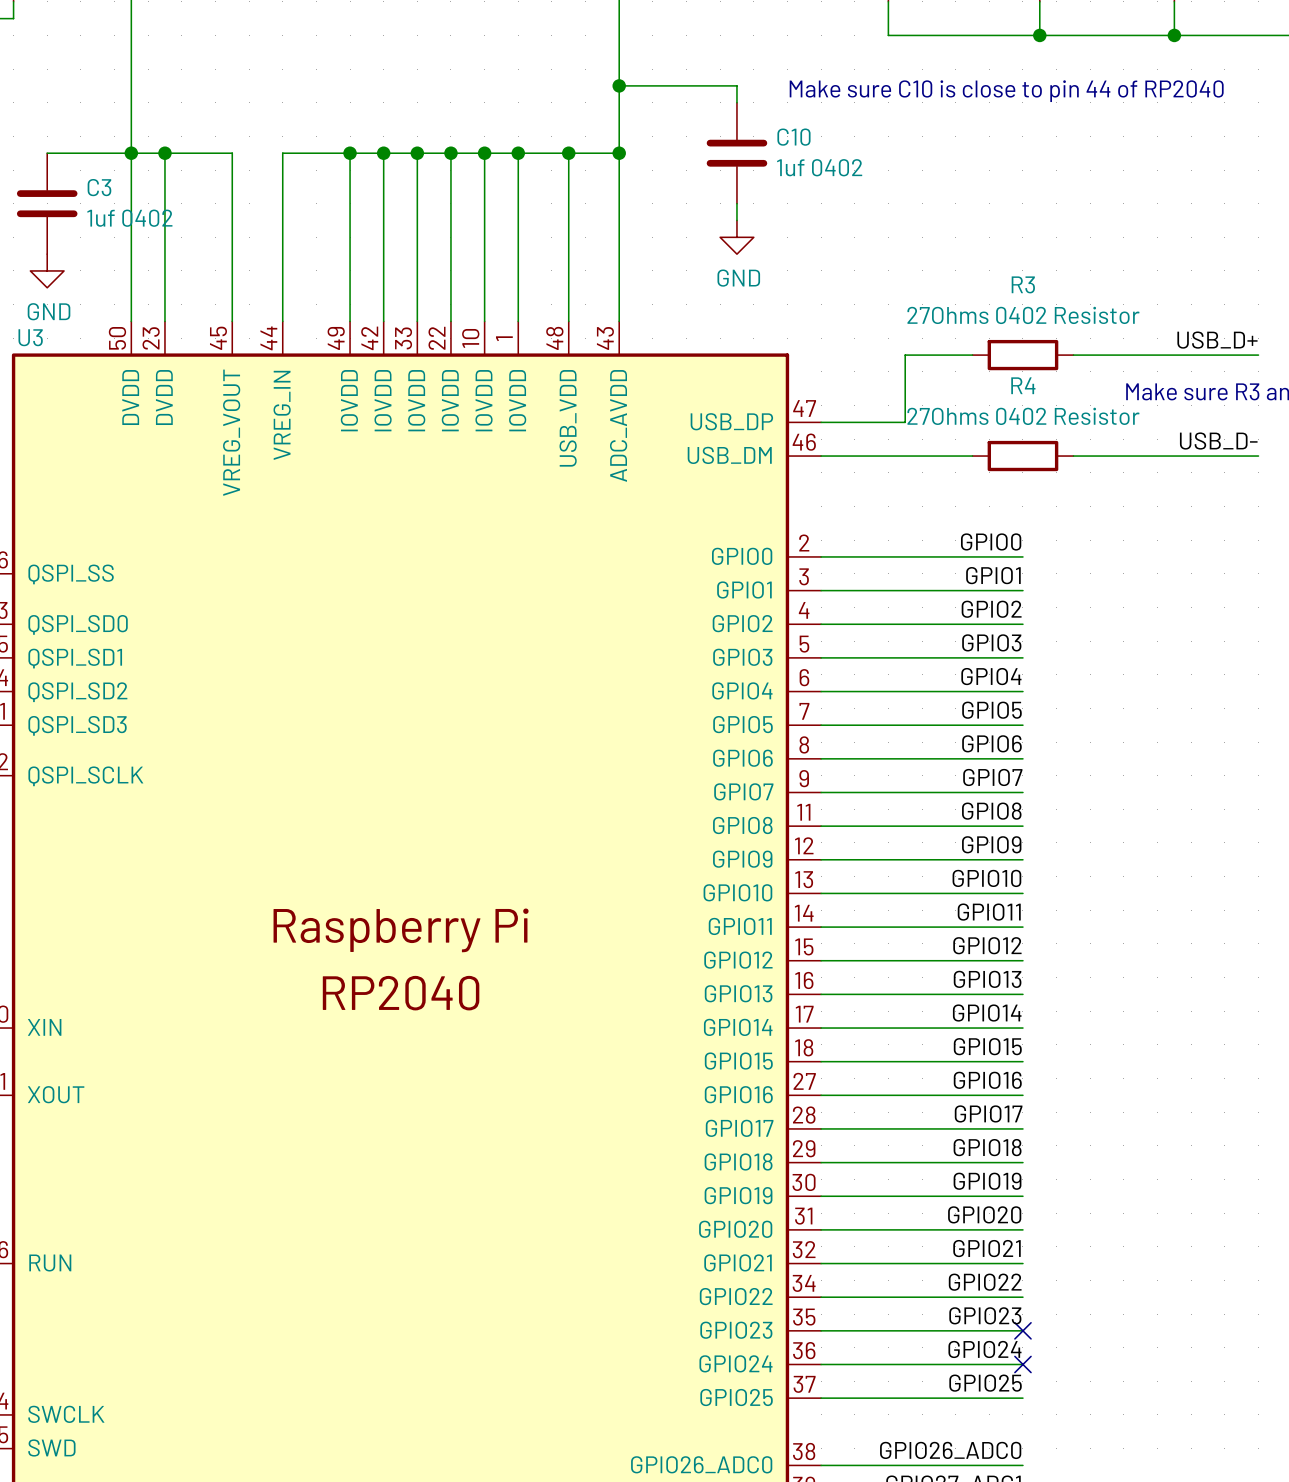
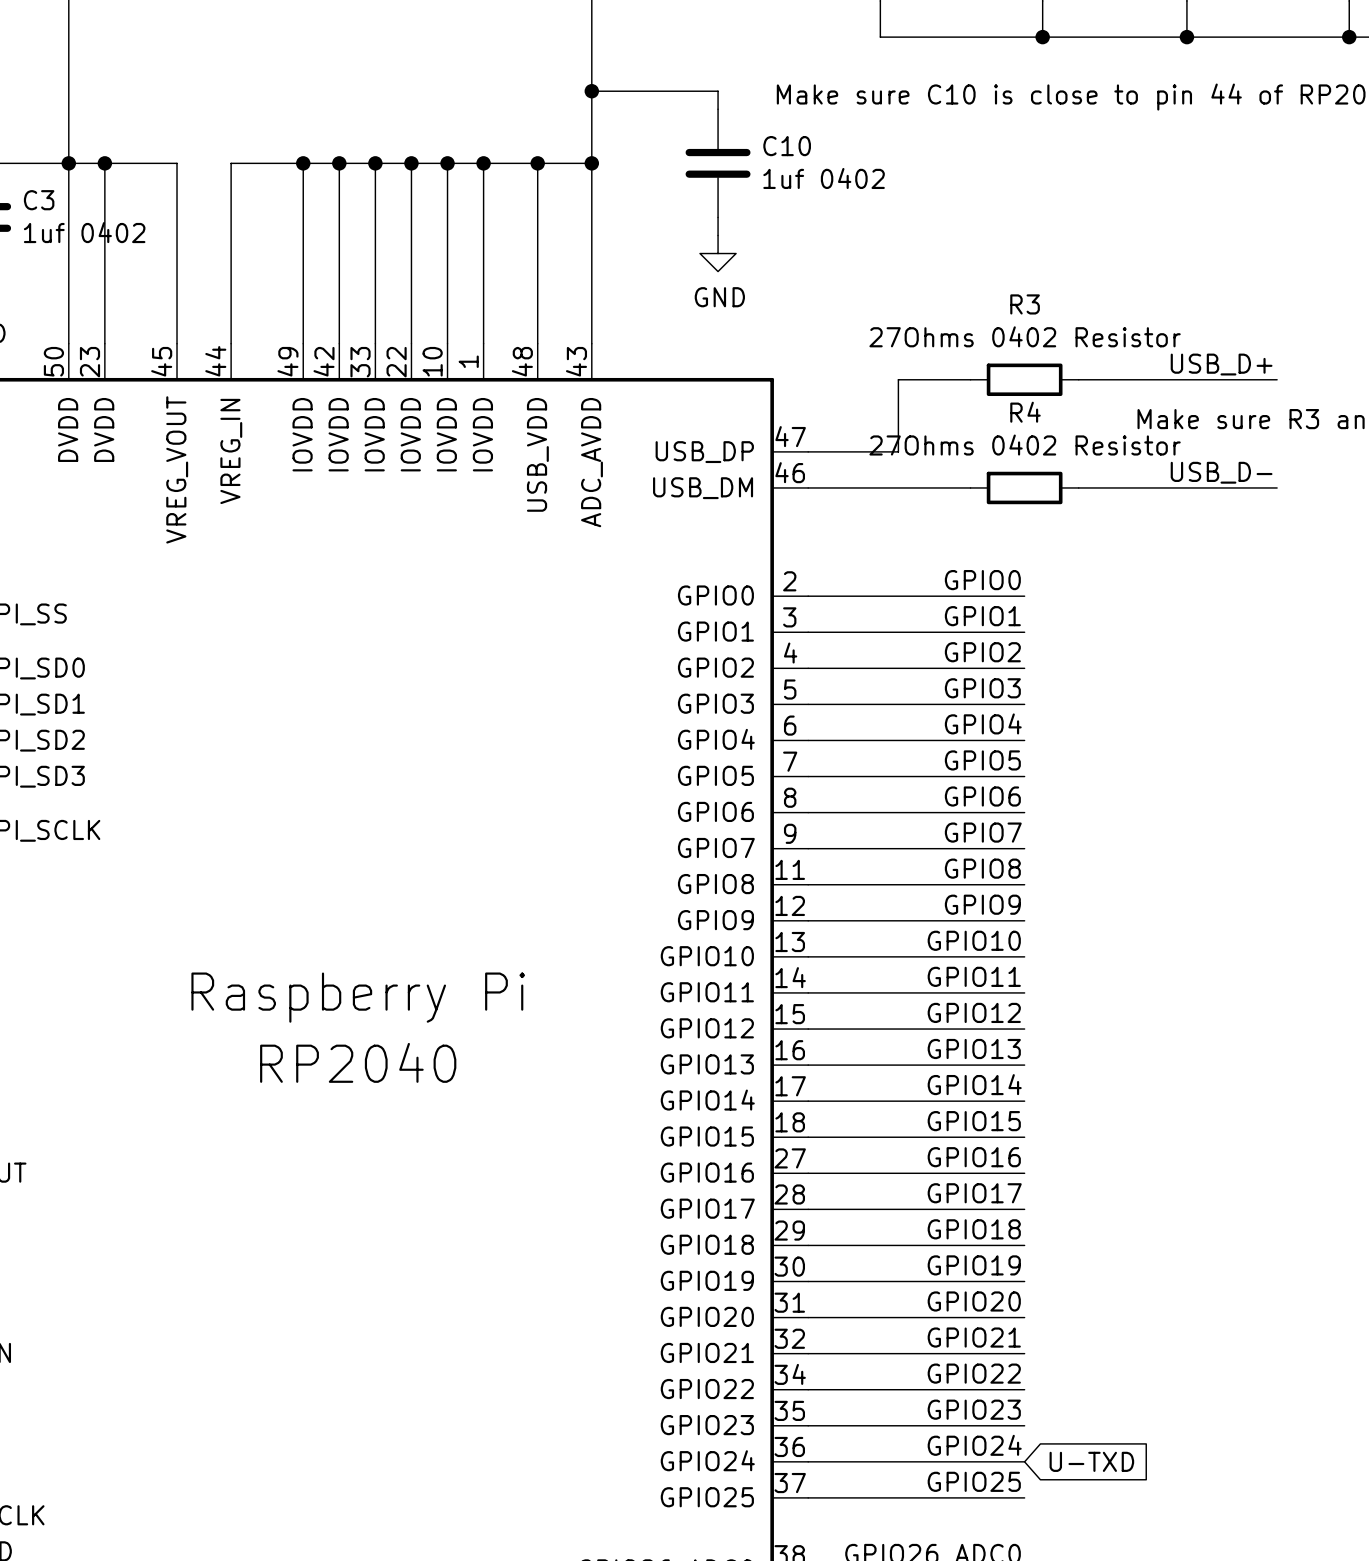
no-connect mark: (1022, 1330) -> none
no-connect mark: (1022, 1364) -> none
global label: none -> U-TXD (1091, 1461)

